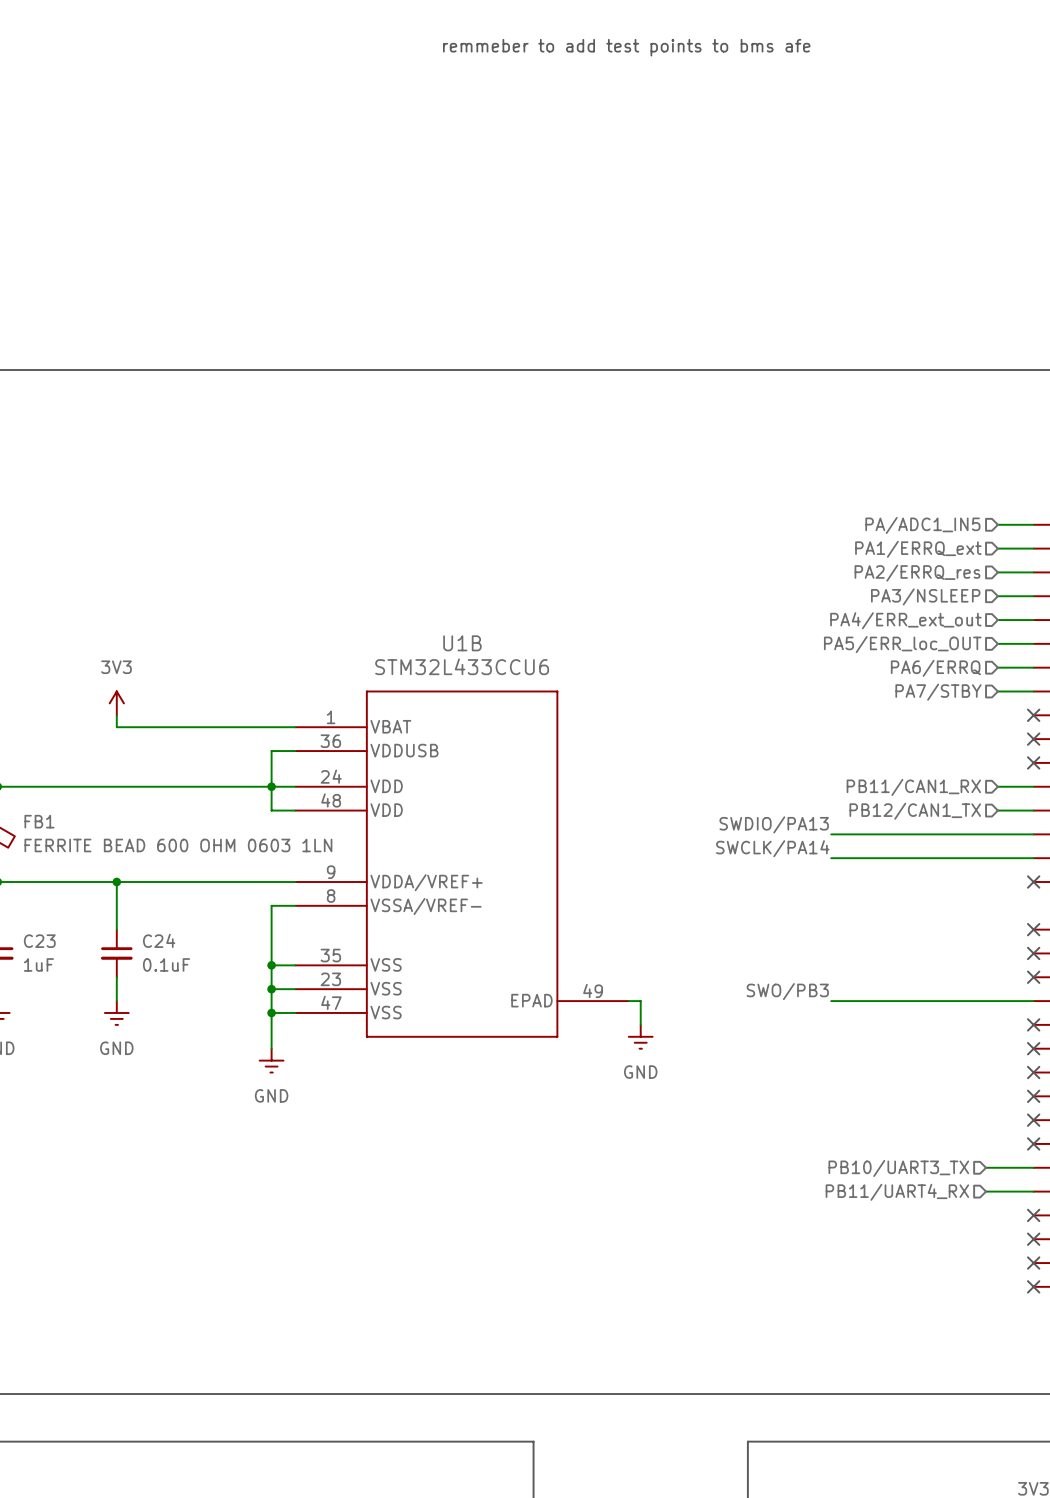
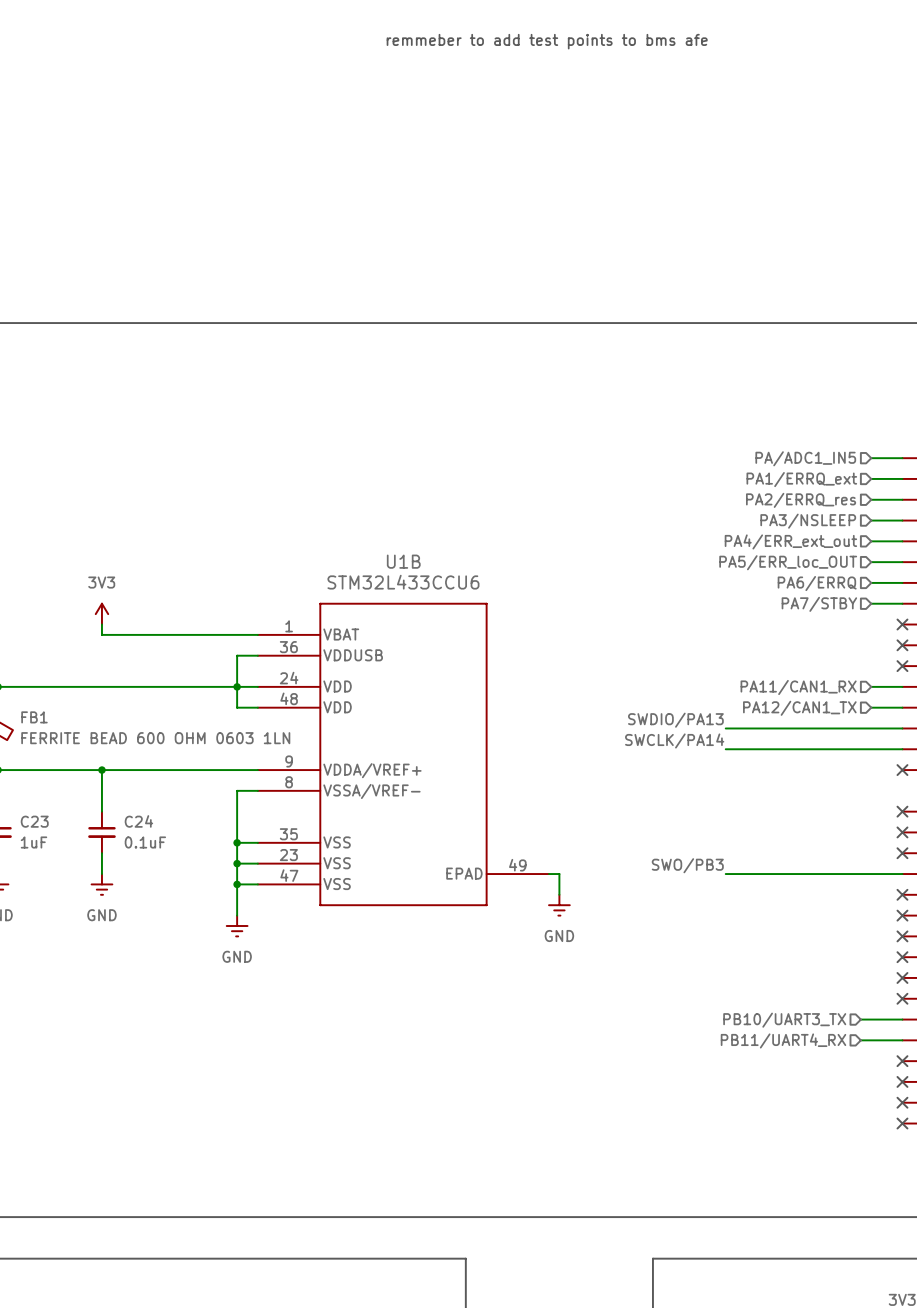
hierarchical label: PB11/CAN1_RX (913, 787) -> PA11/CAN1_RX (798, 687)
hierarchical label: PB12/CAN1_TX (915, 811) -> PA12/CAN1_TX (799, 708)

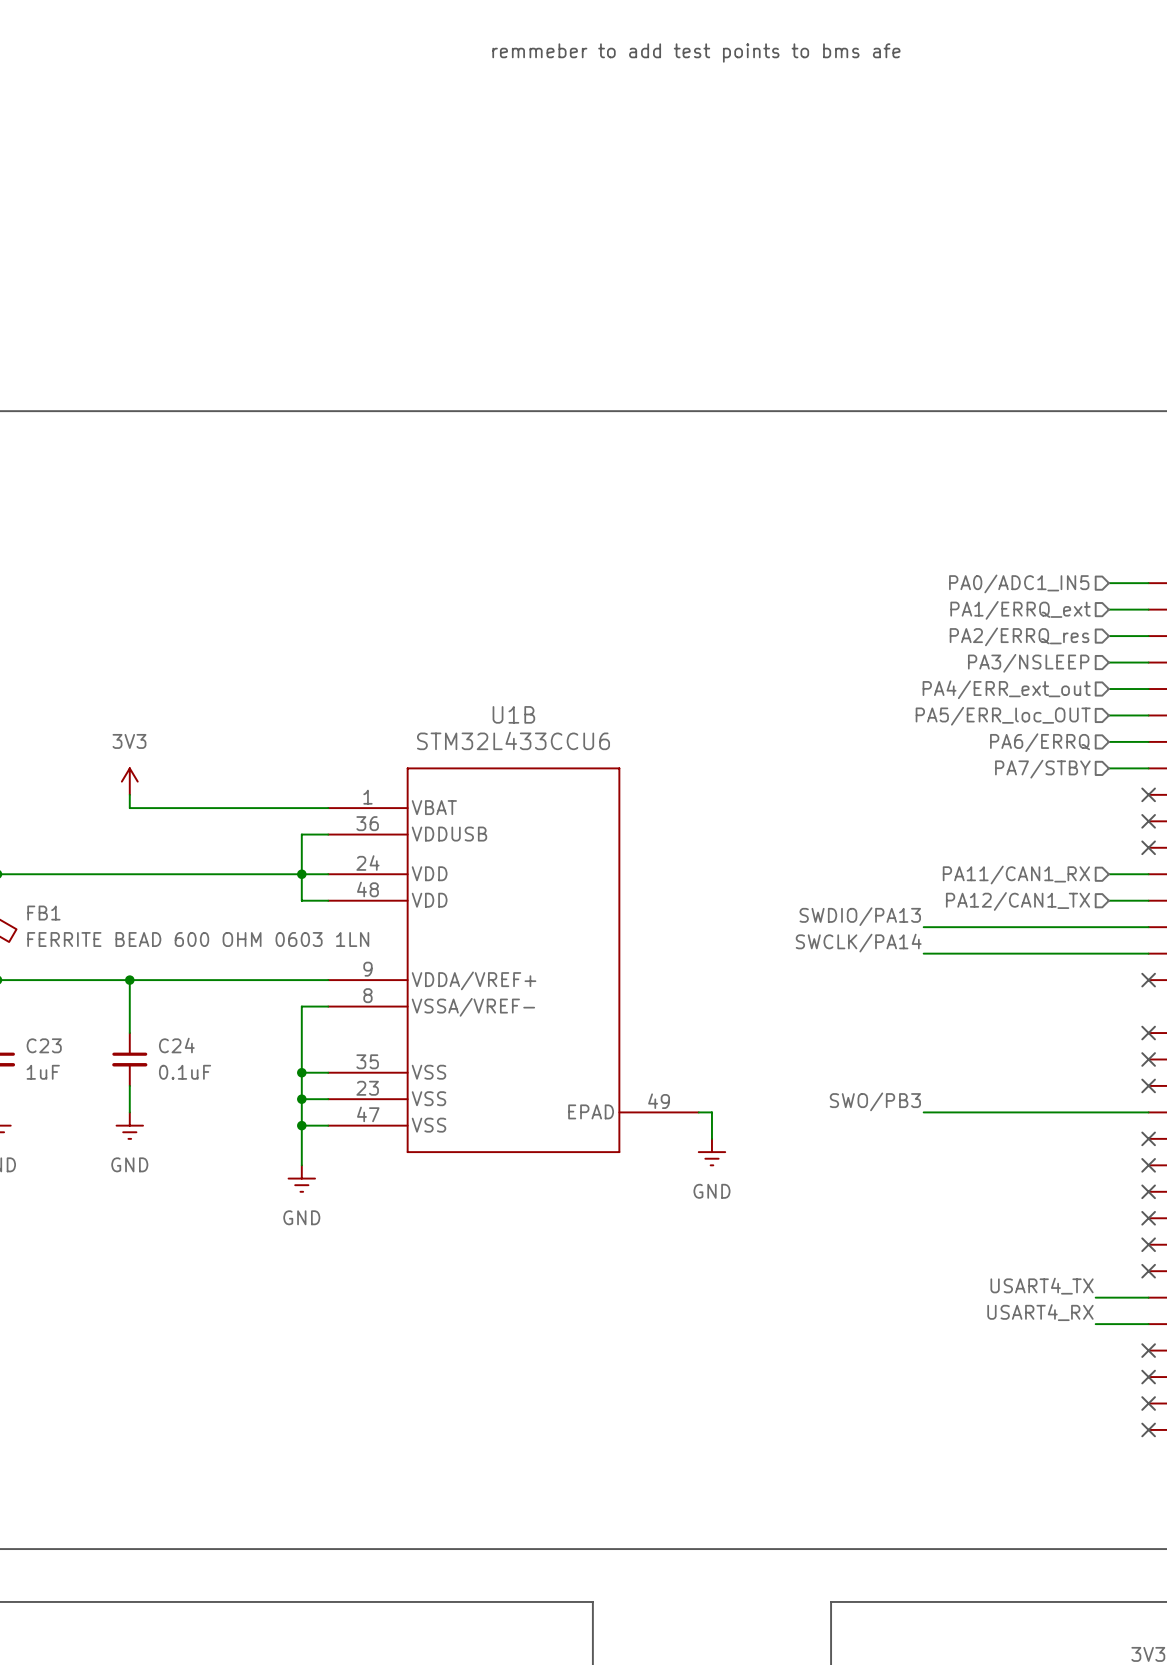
hierarchical label: PA/ADC1_IN5 (805, 458) -> PA0/ADC1_IN5 (1019, 583)
label: none -> USART4_TX (1042, 1286)
hierarchical label: PB10/UART3_TX (784, 1020) -> none
label: none -> USART4_RX (1040, 1312)
hierarchical label: PB11/UART4_RX (783, 1040) -> none

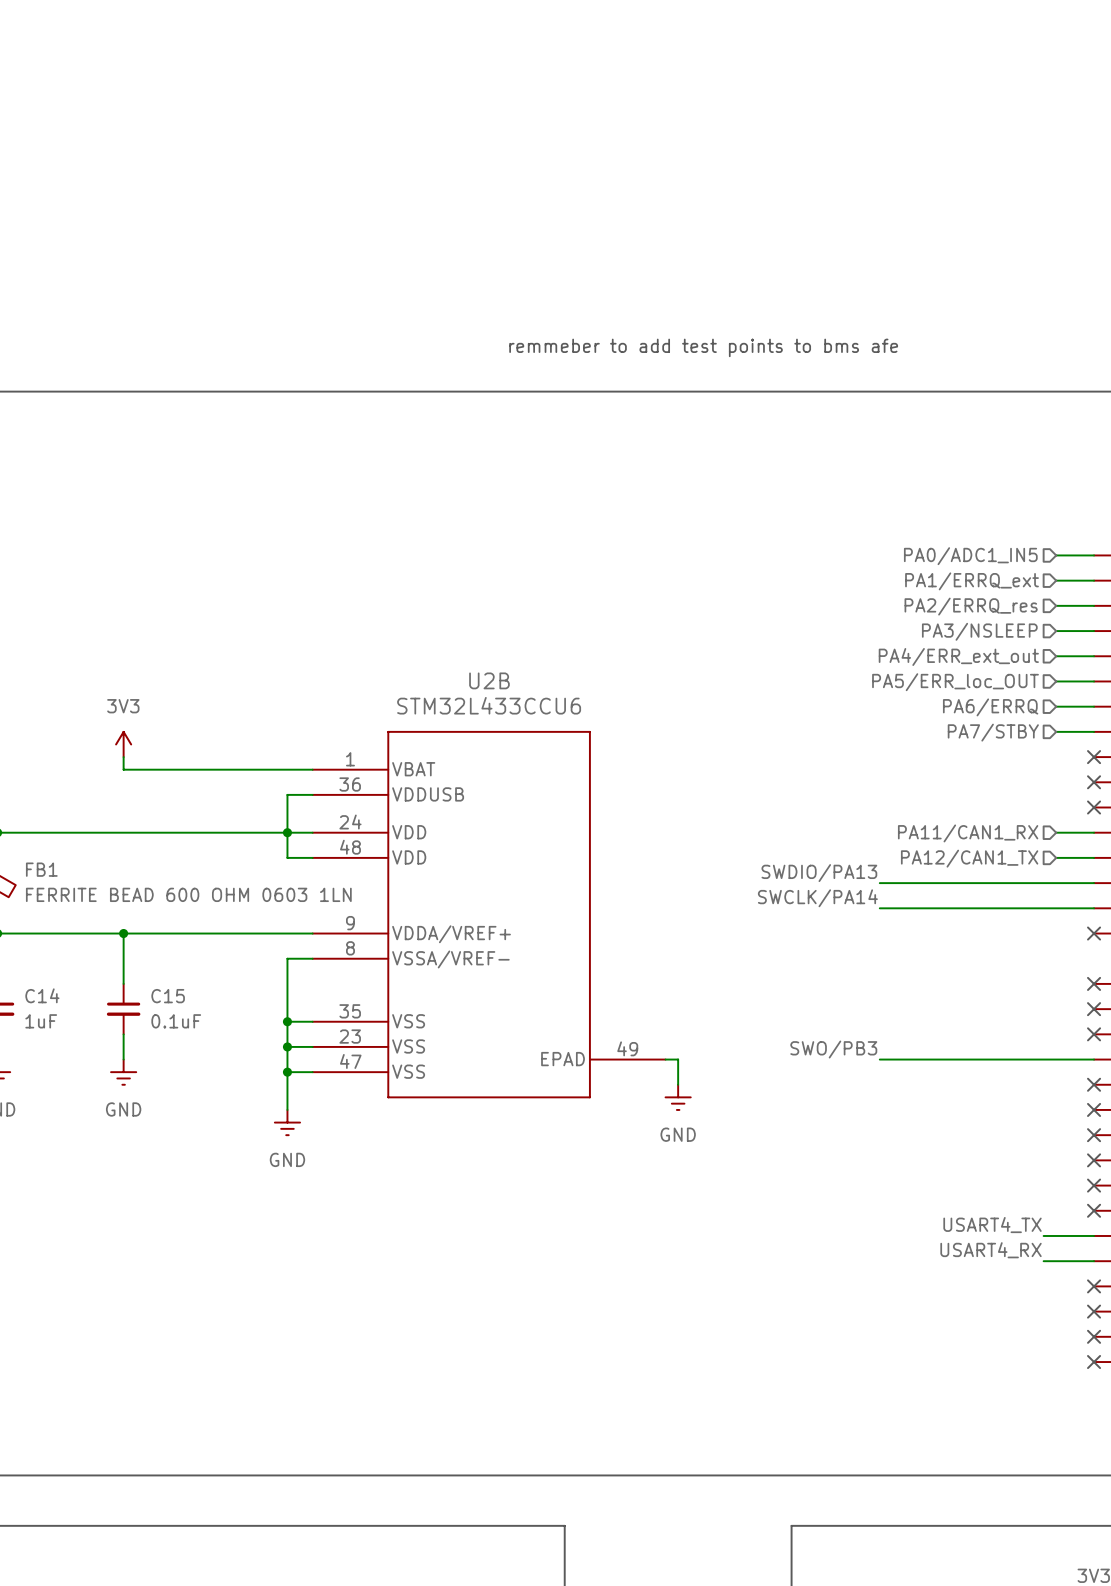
text: remmeber to add test points to bms afe (696, 53) -> none
text: none -> remmeber to add test points to bms afe (703, 347)
U1B name: U1B (513, 714) -> U2B (489, 680)
C23 name: C23 (44, 1045) -> C14 (42, 995)
C24 name: C24 (176, 1045) -> C15 (168, 996)

